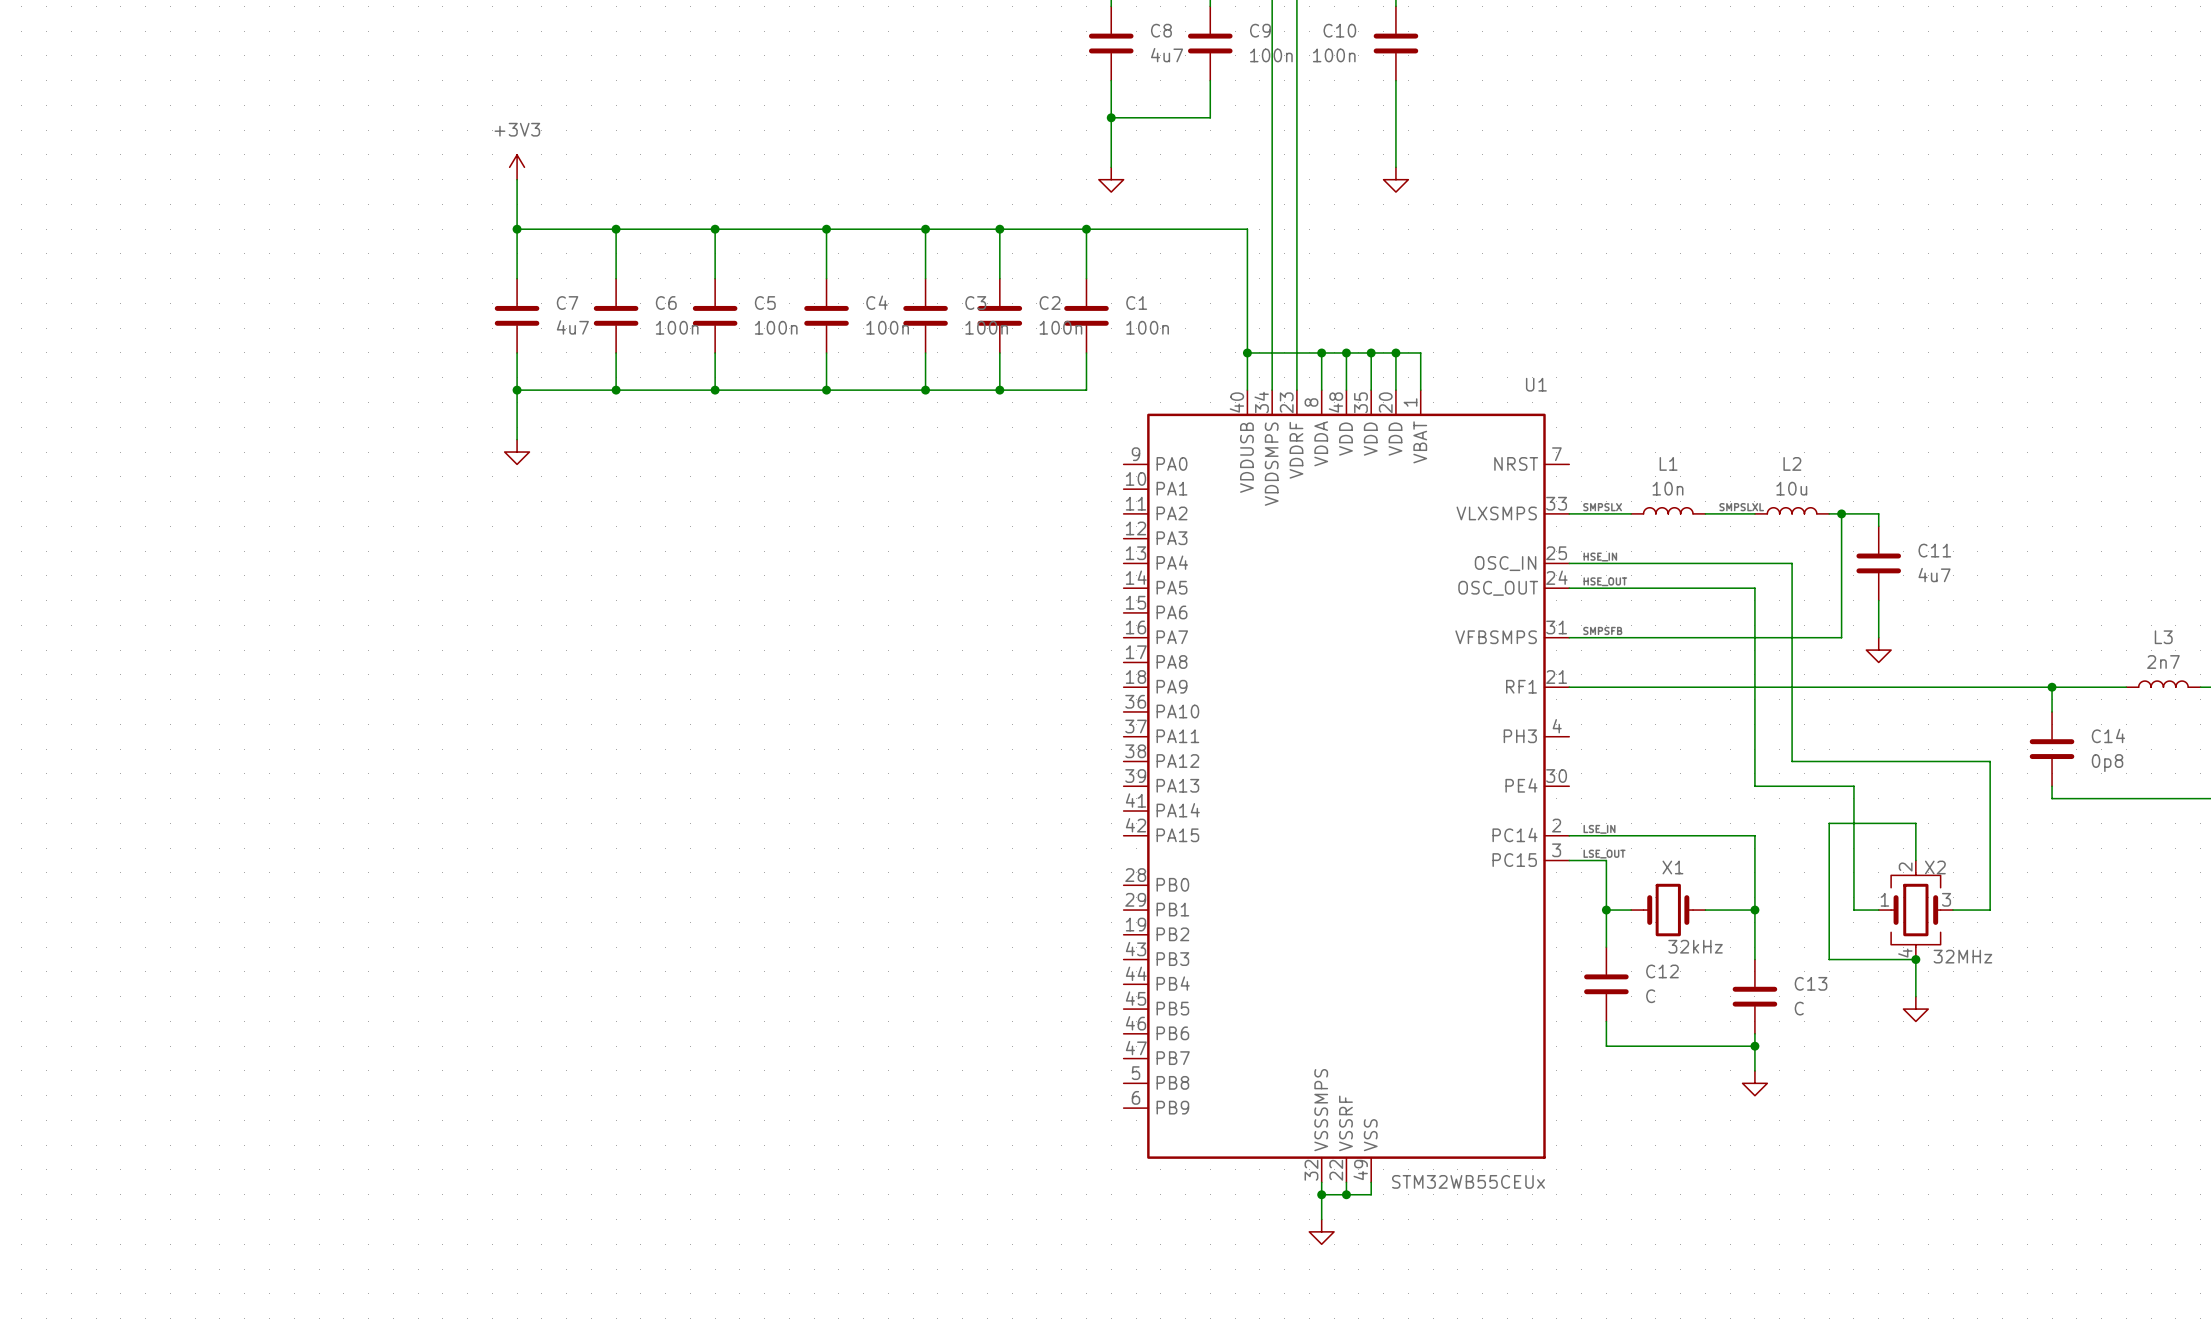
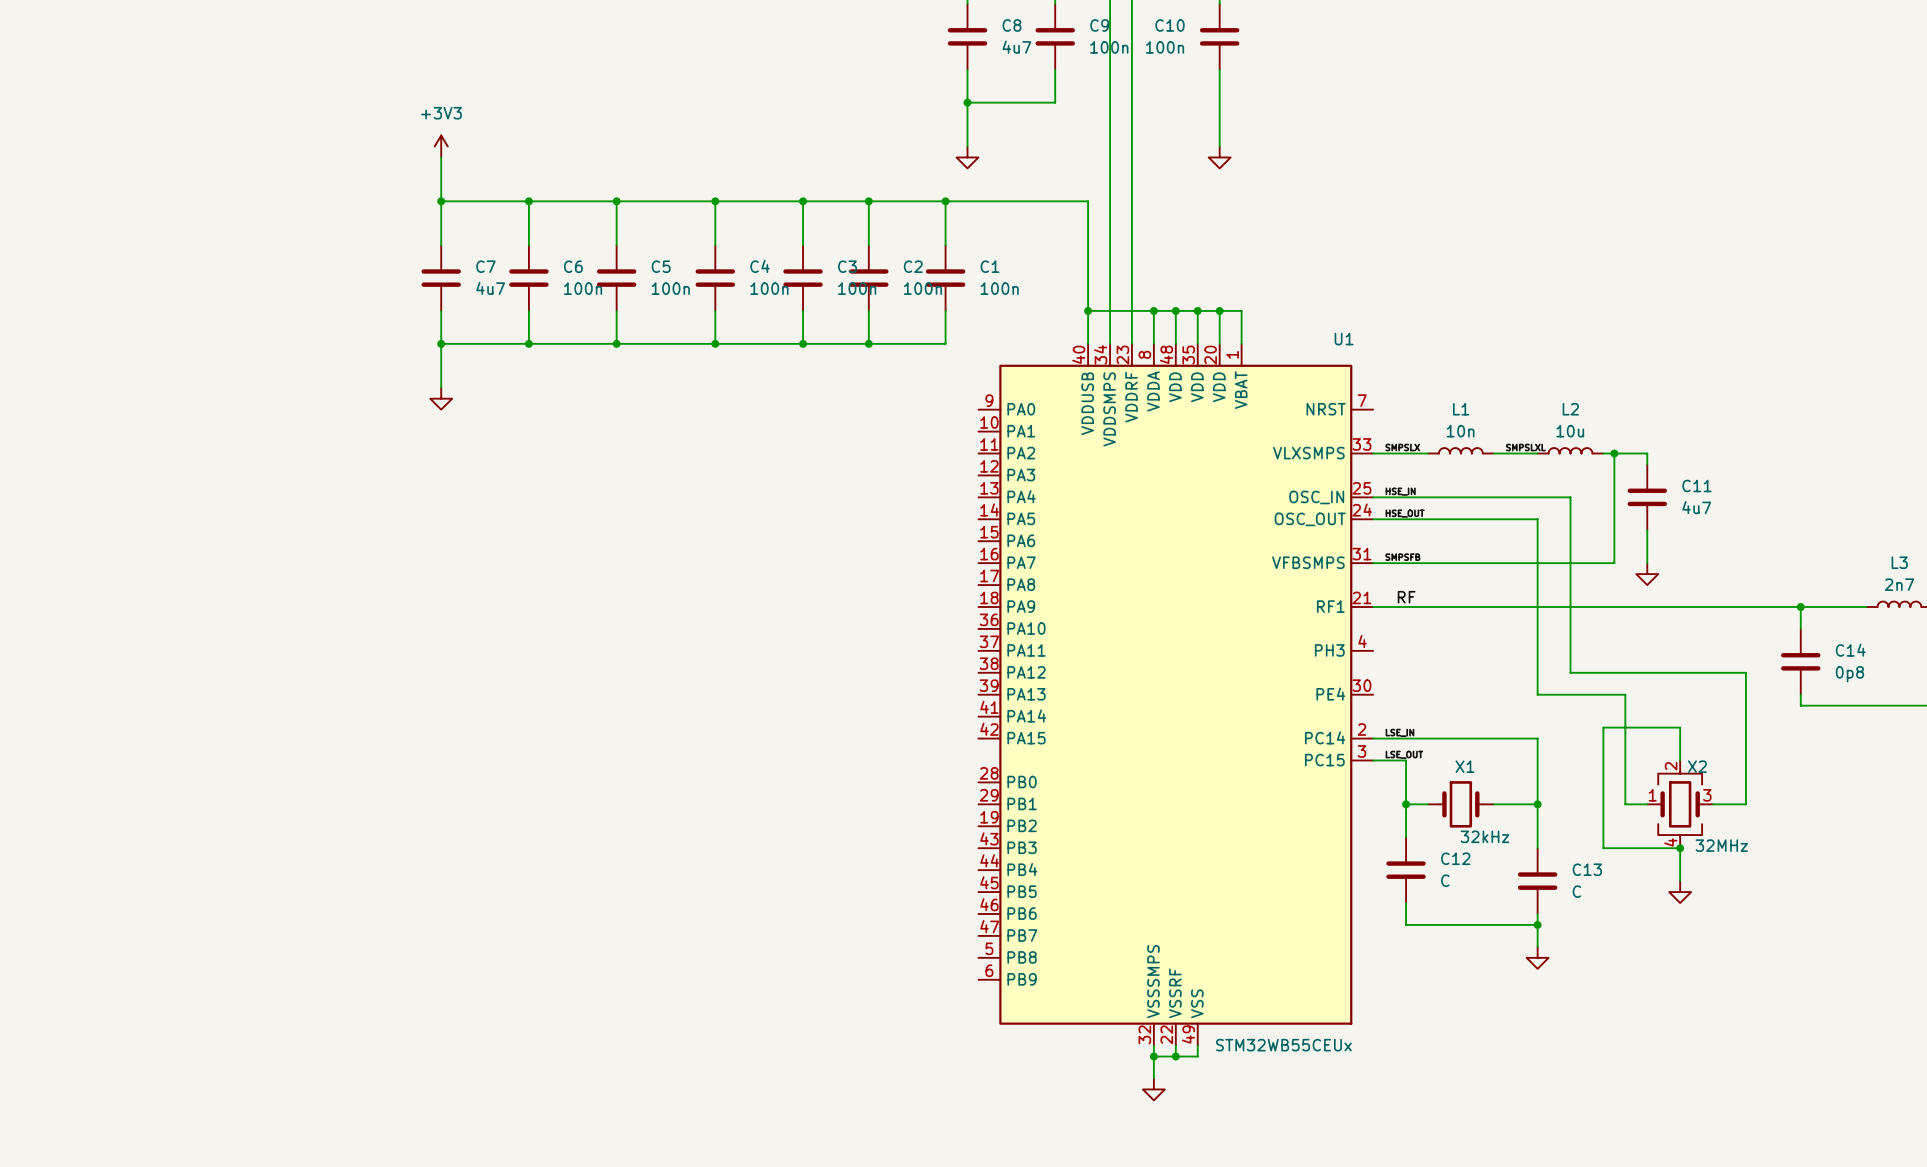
label: none -> RF (1406, 597)

